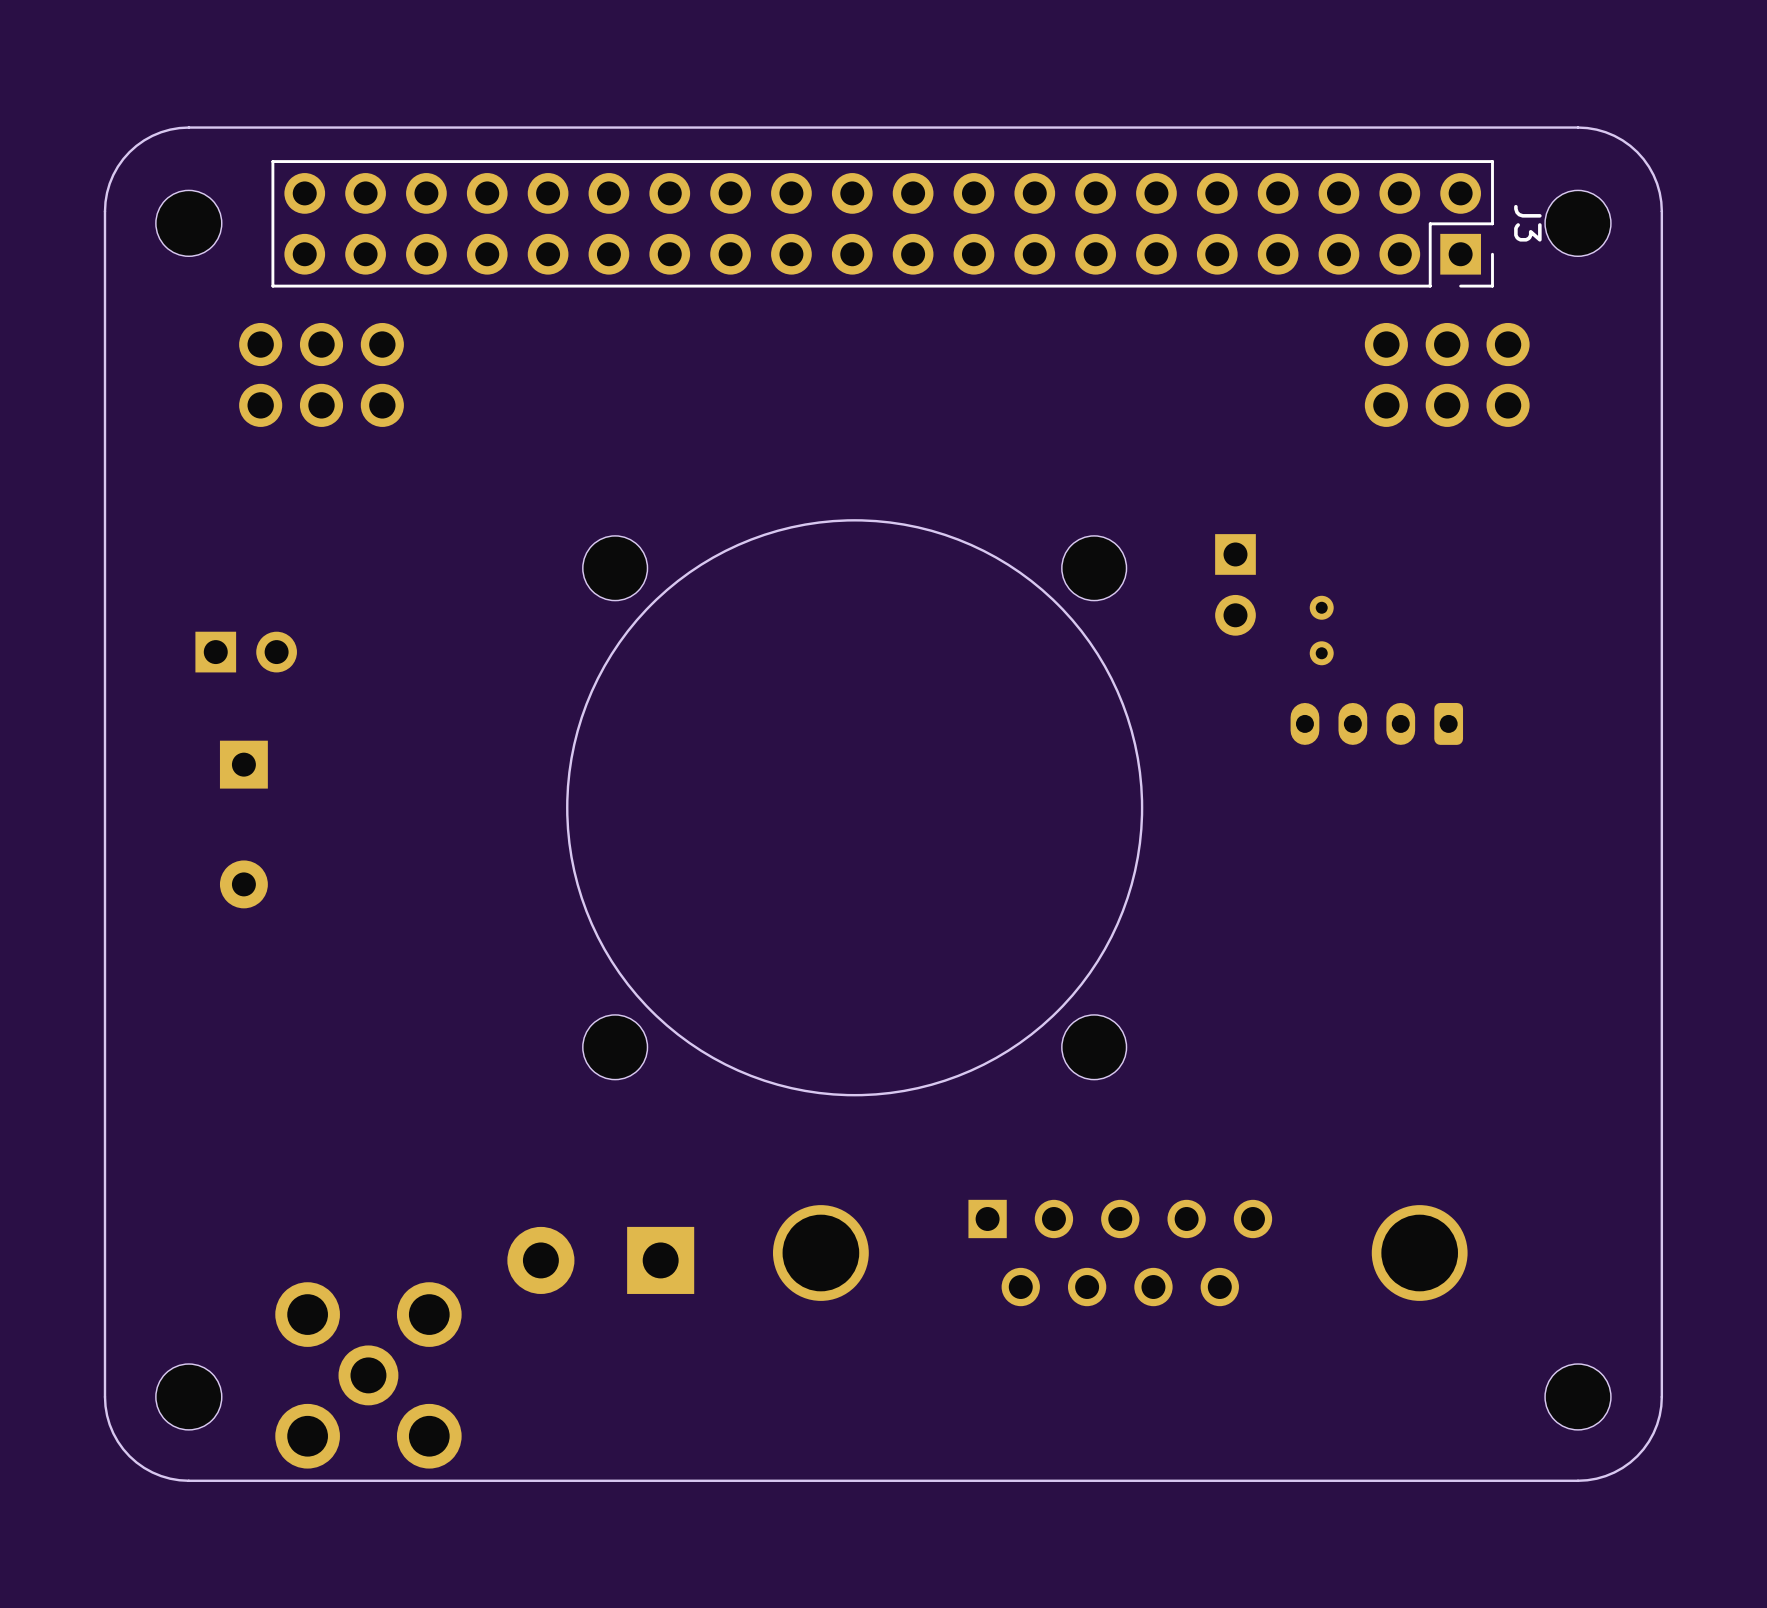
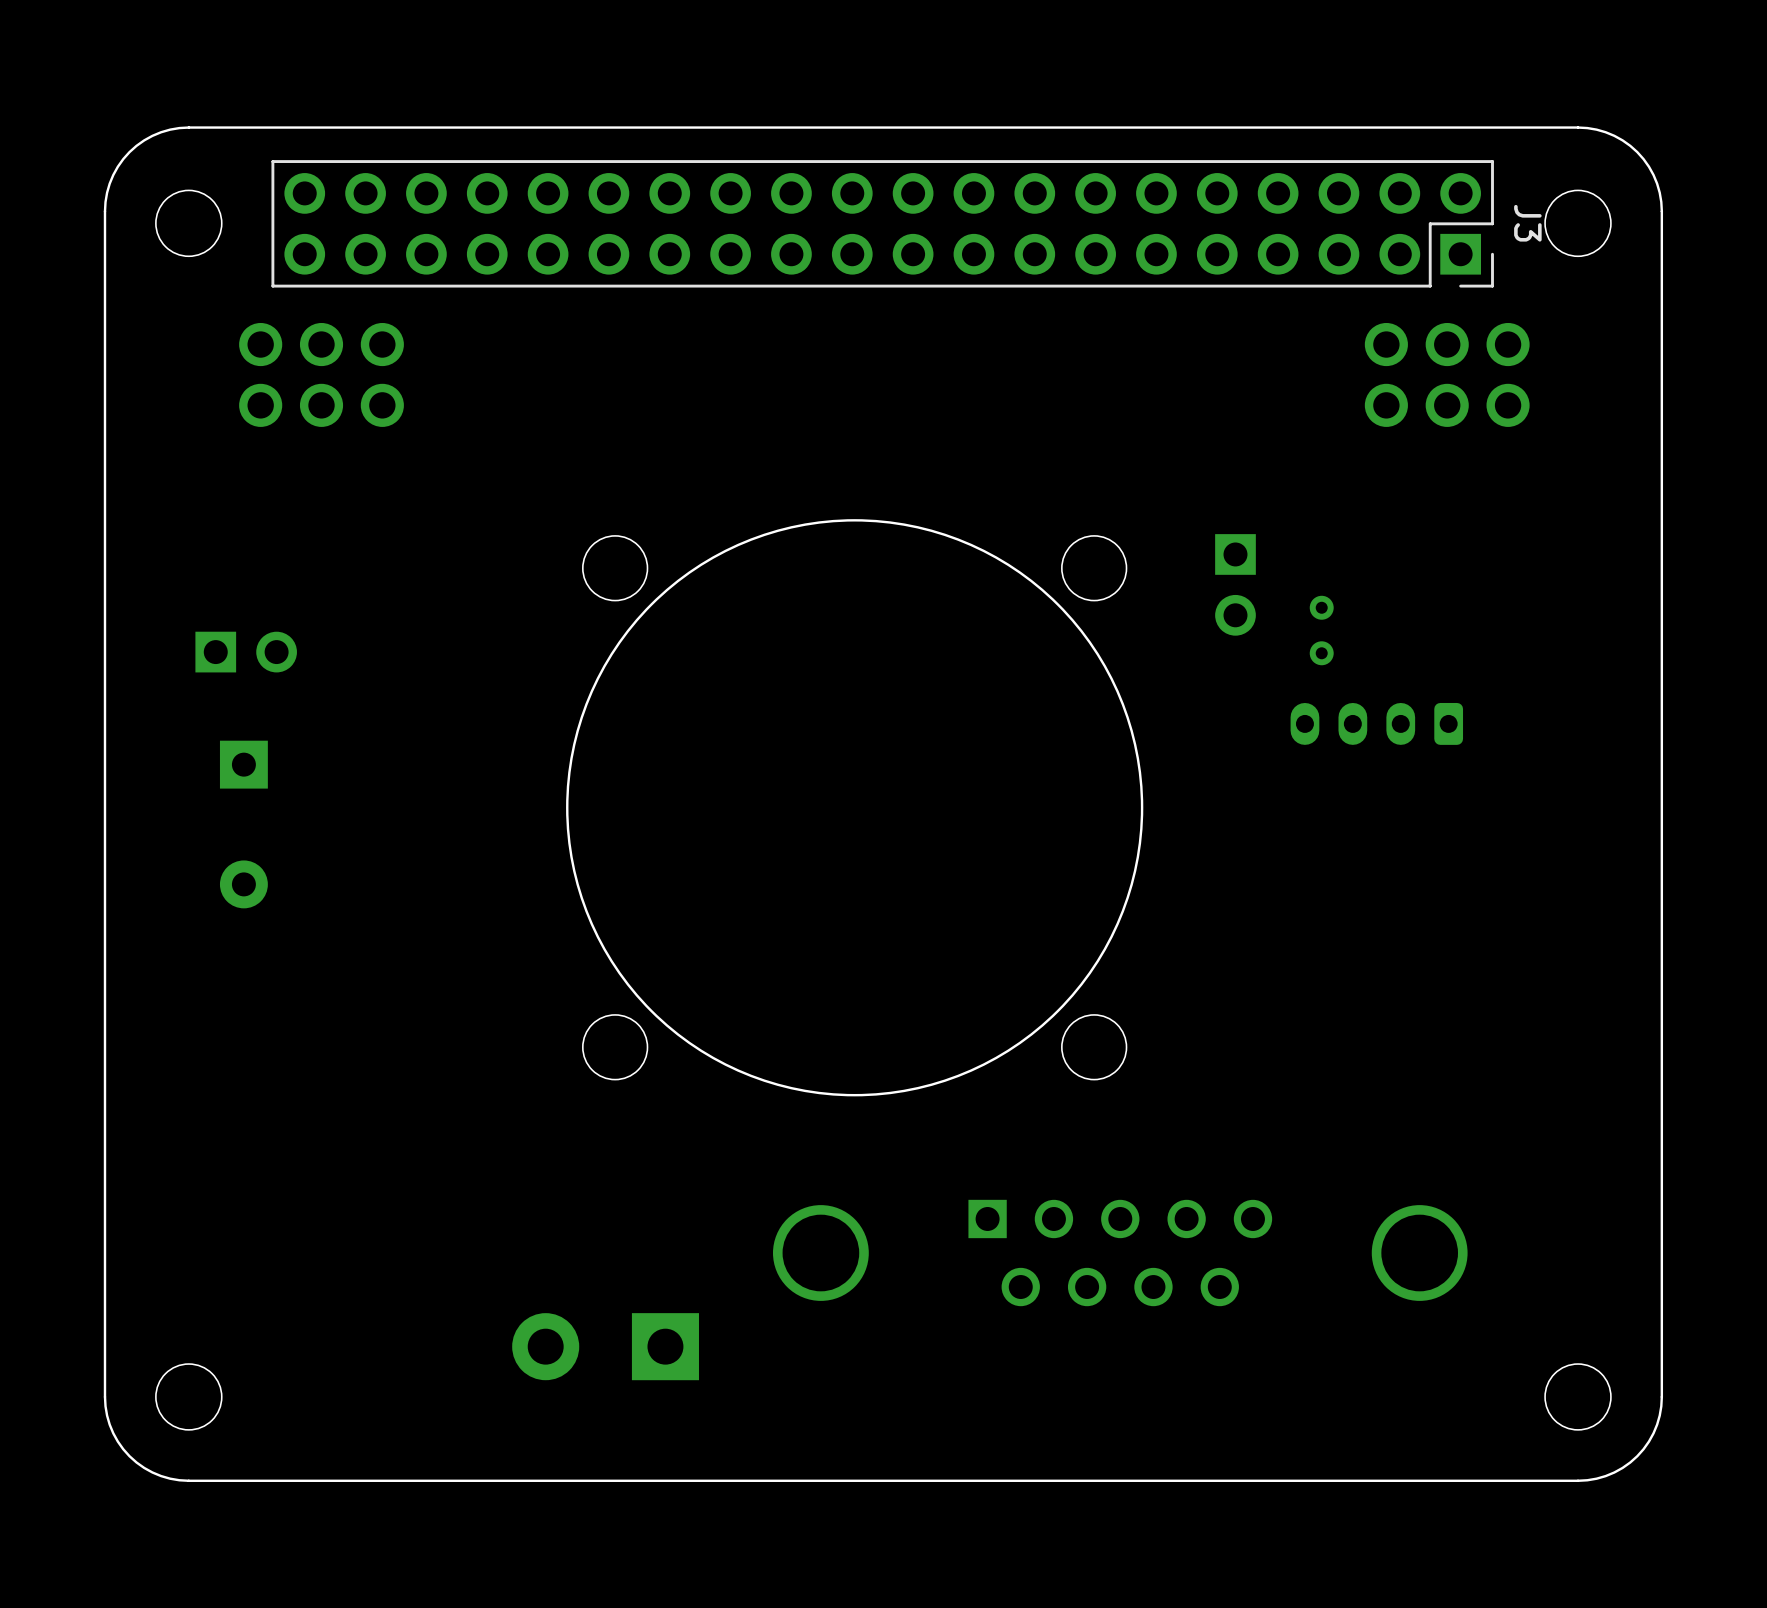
part position: (600, 1260) -> (605, 1346)
part: (368, 1375) -> none

